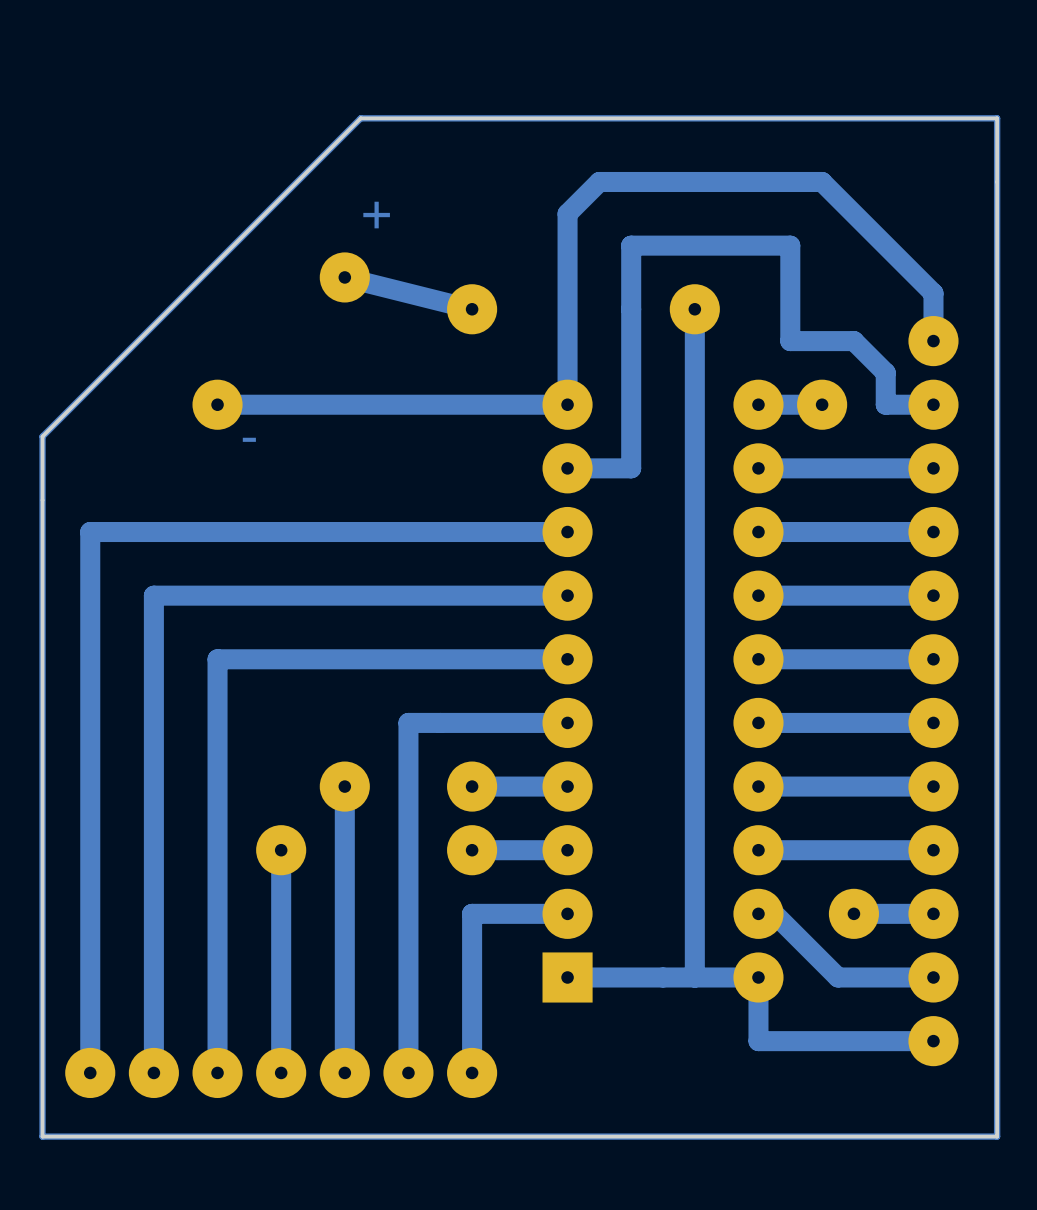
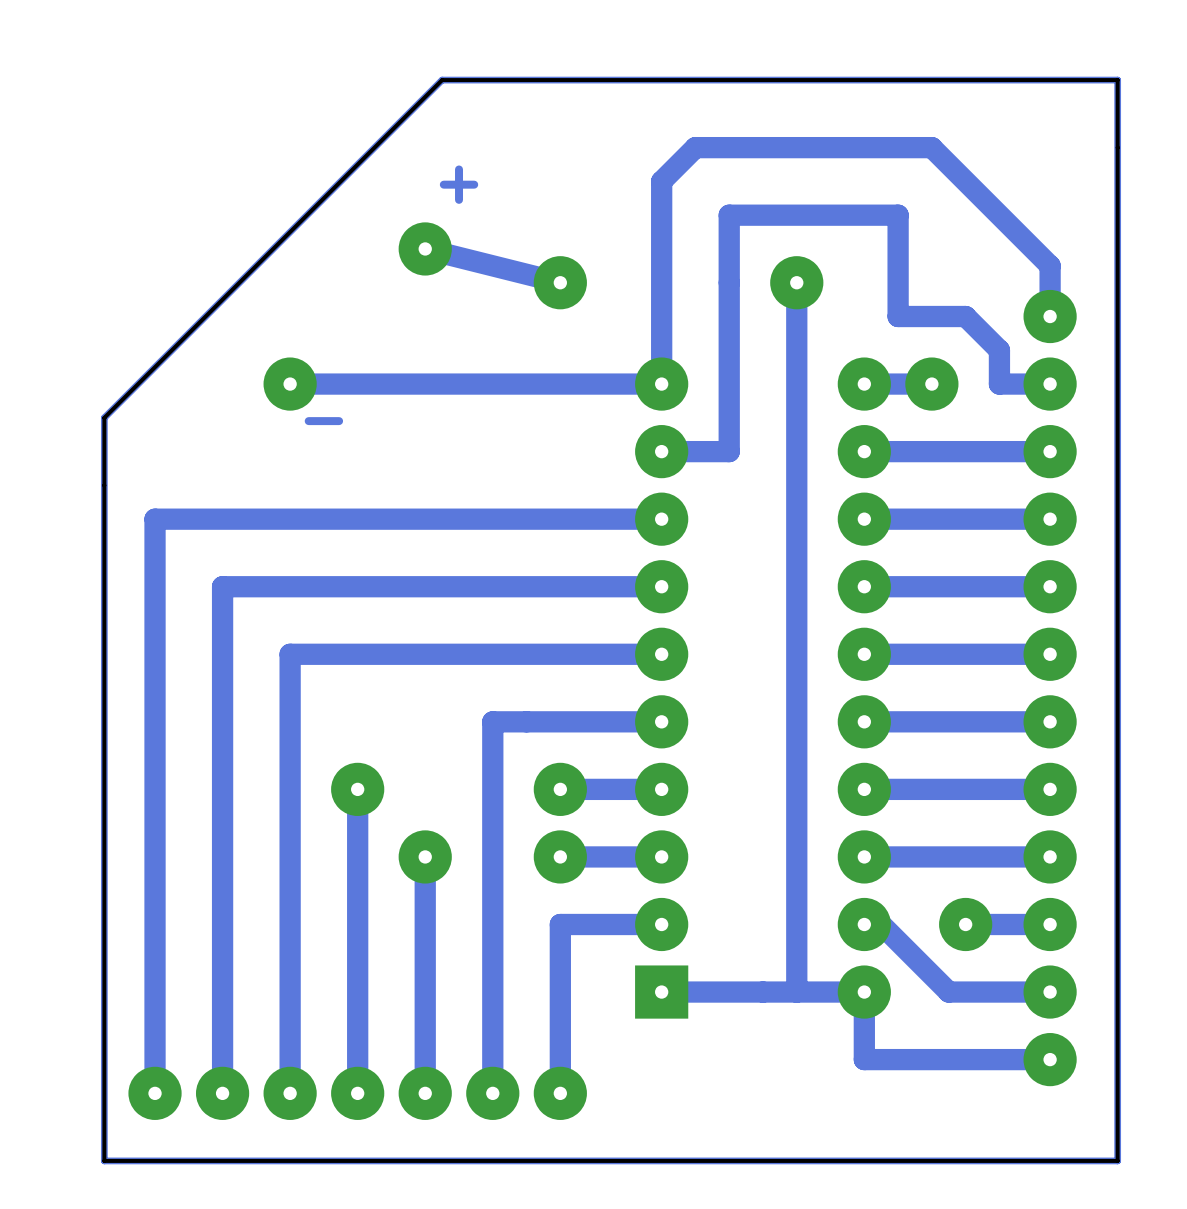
part: none -> (357, 789)
bottom track: (344, 786) (344, 850) -> (357, 789) (357, 856)
part: (344, 786) -> none
part: (281, 850) -> none
part: none -> (425, 856)

